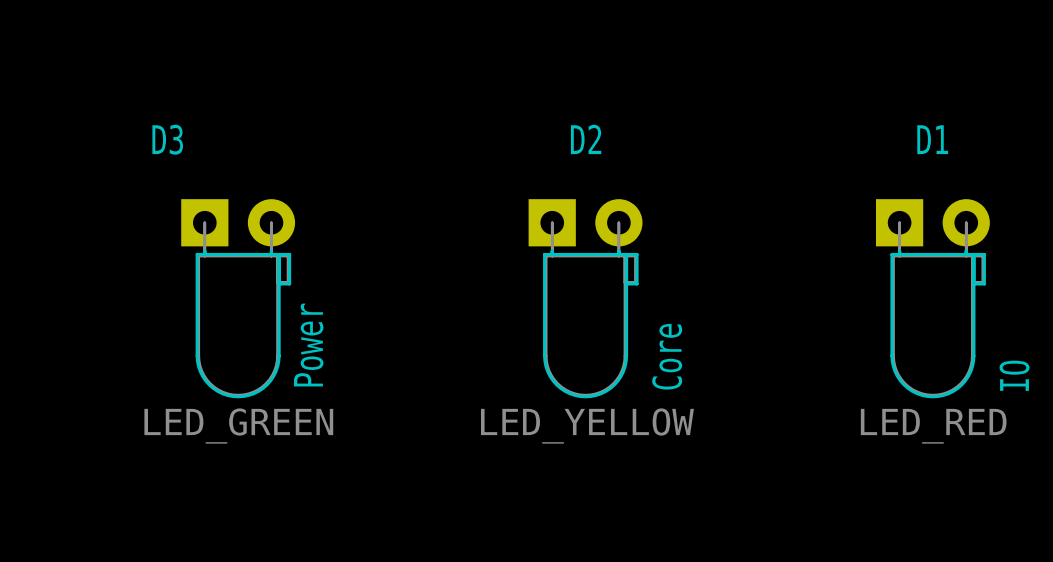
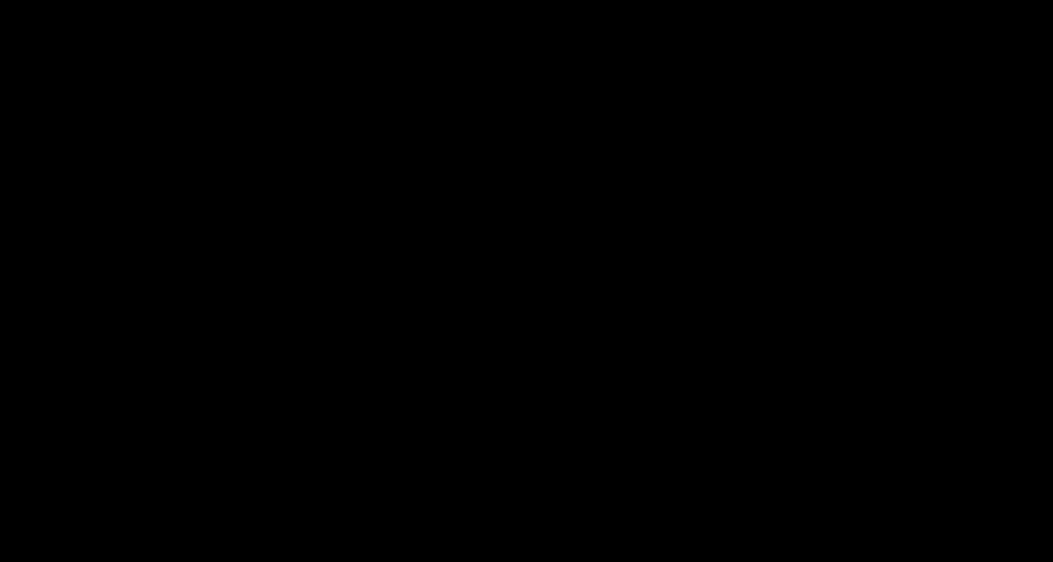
D3: LED_GREEN (238, 298) -> none
D2: LED_YELLOW (585, 298) -> none
D1: LED_RED (932, 298) -> none

